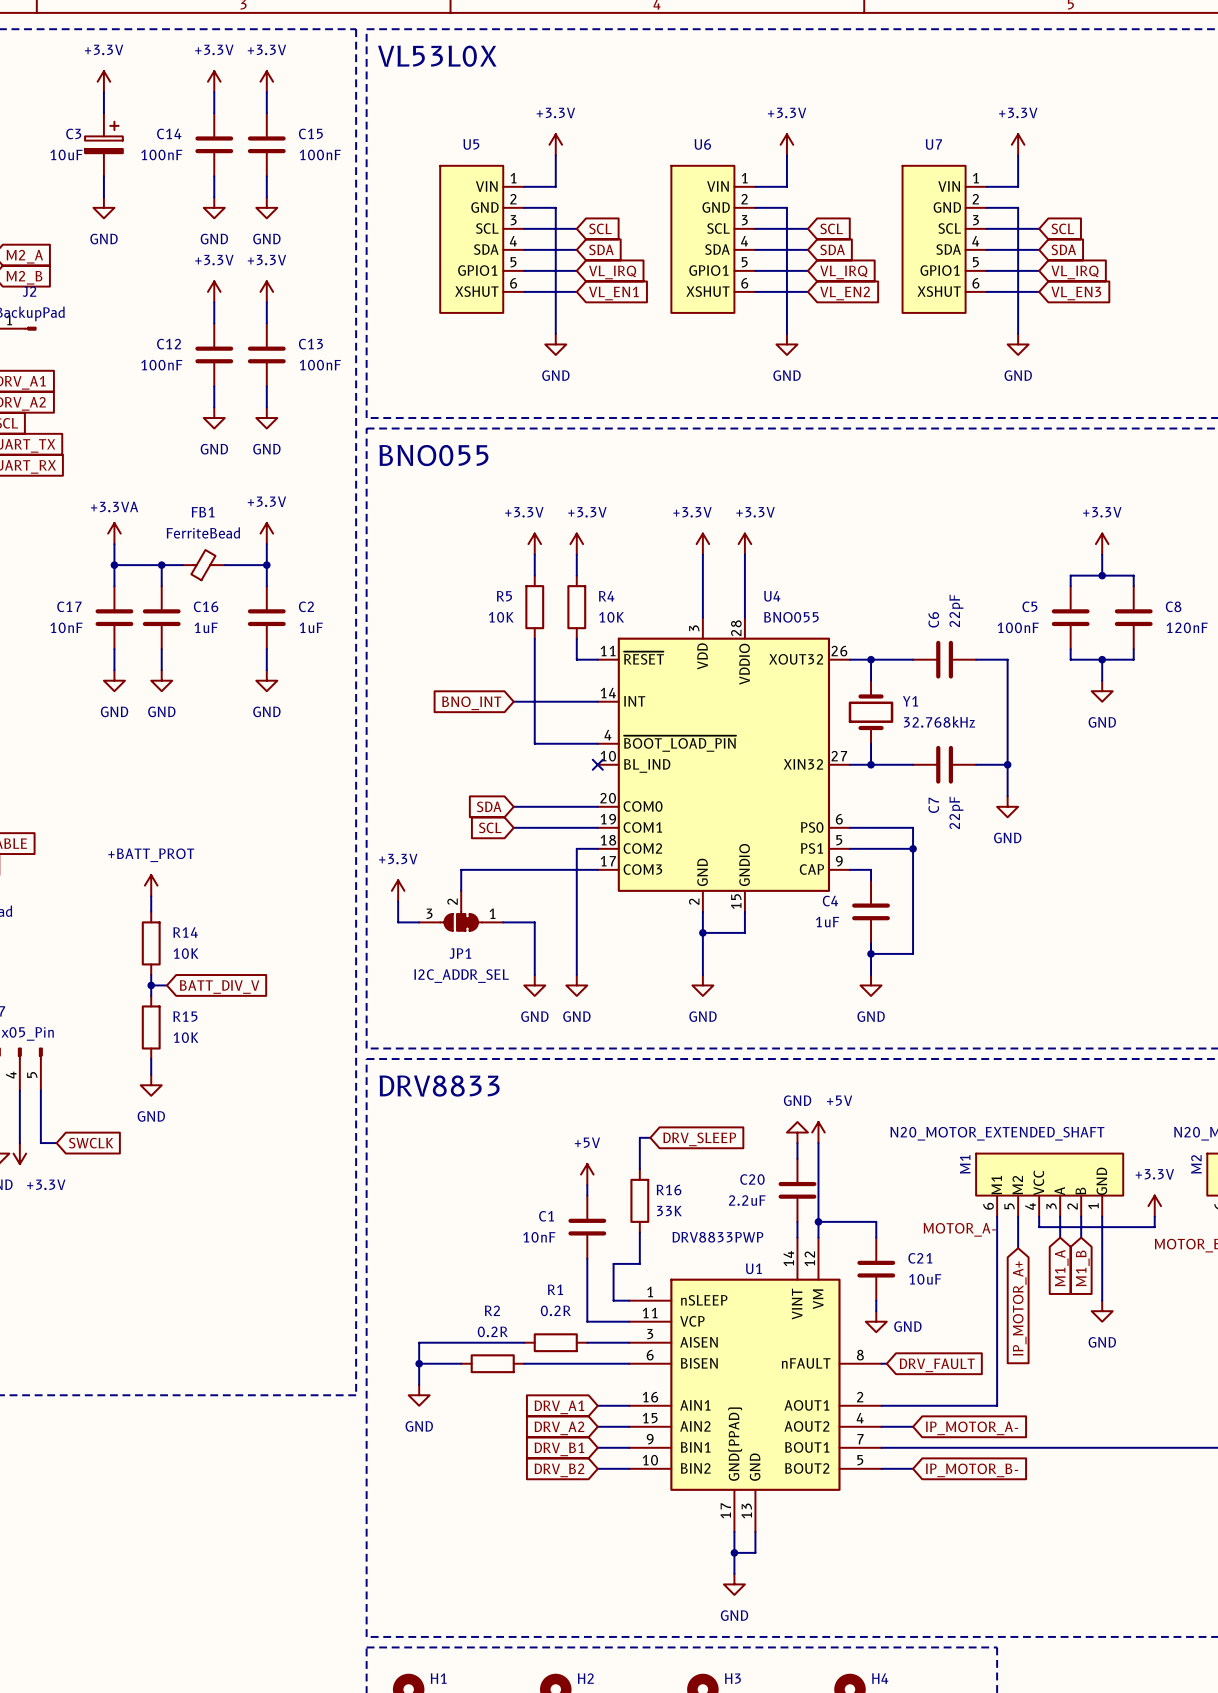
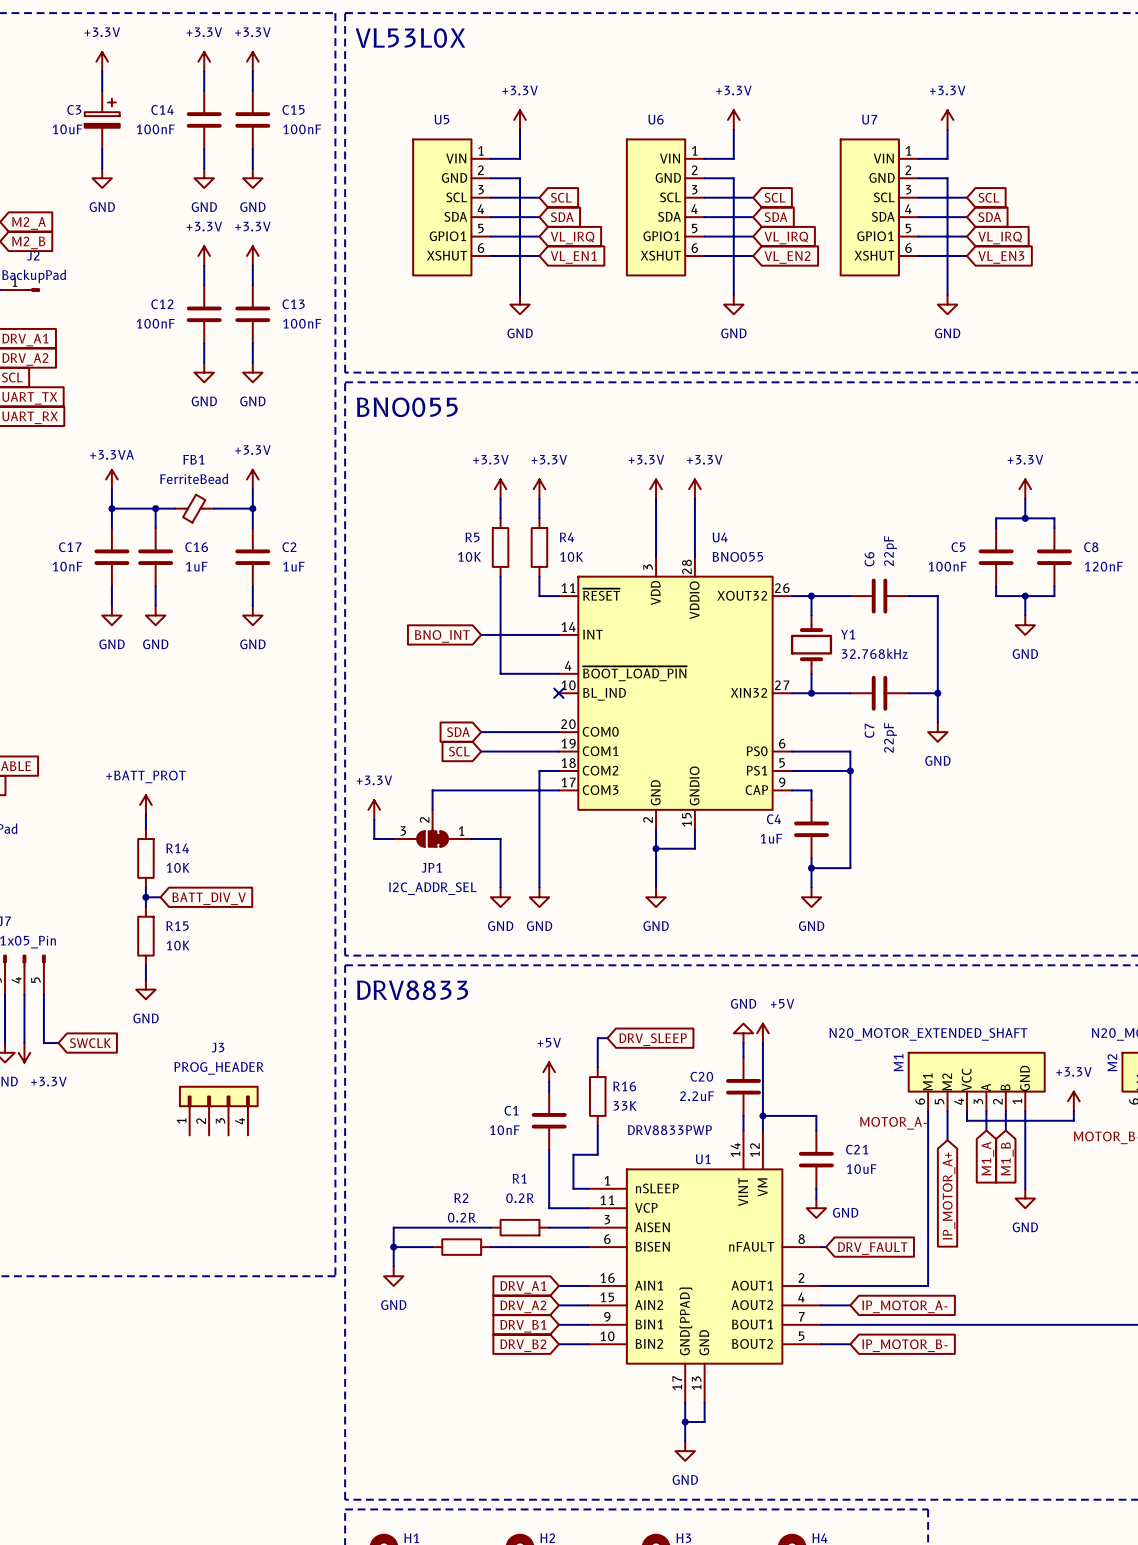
J3: none -> PROG_HEADER (218, 1110)

